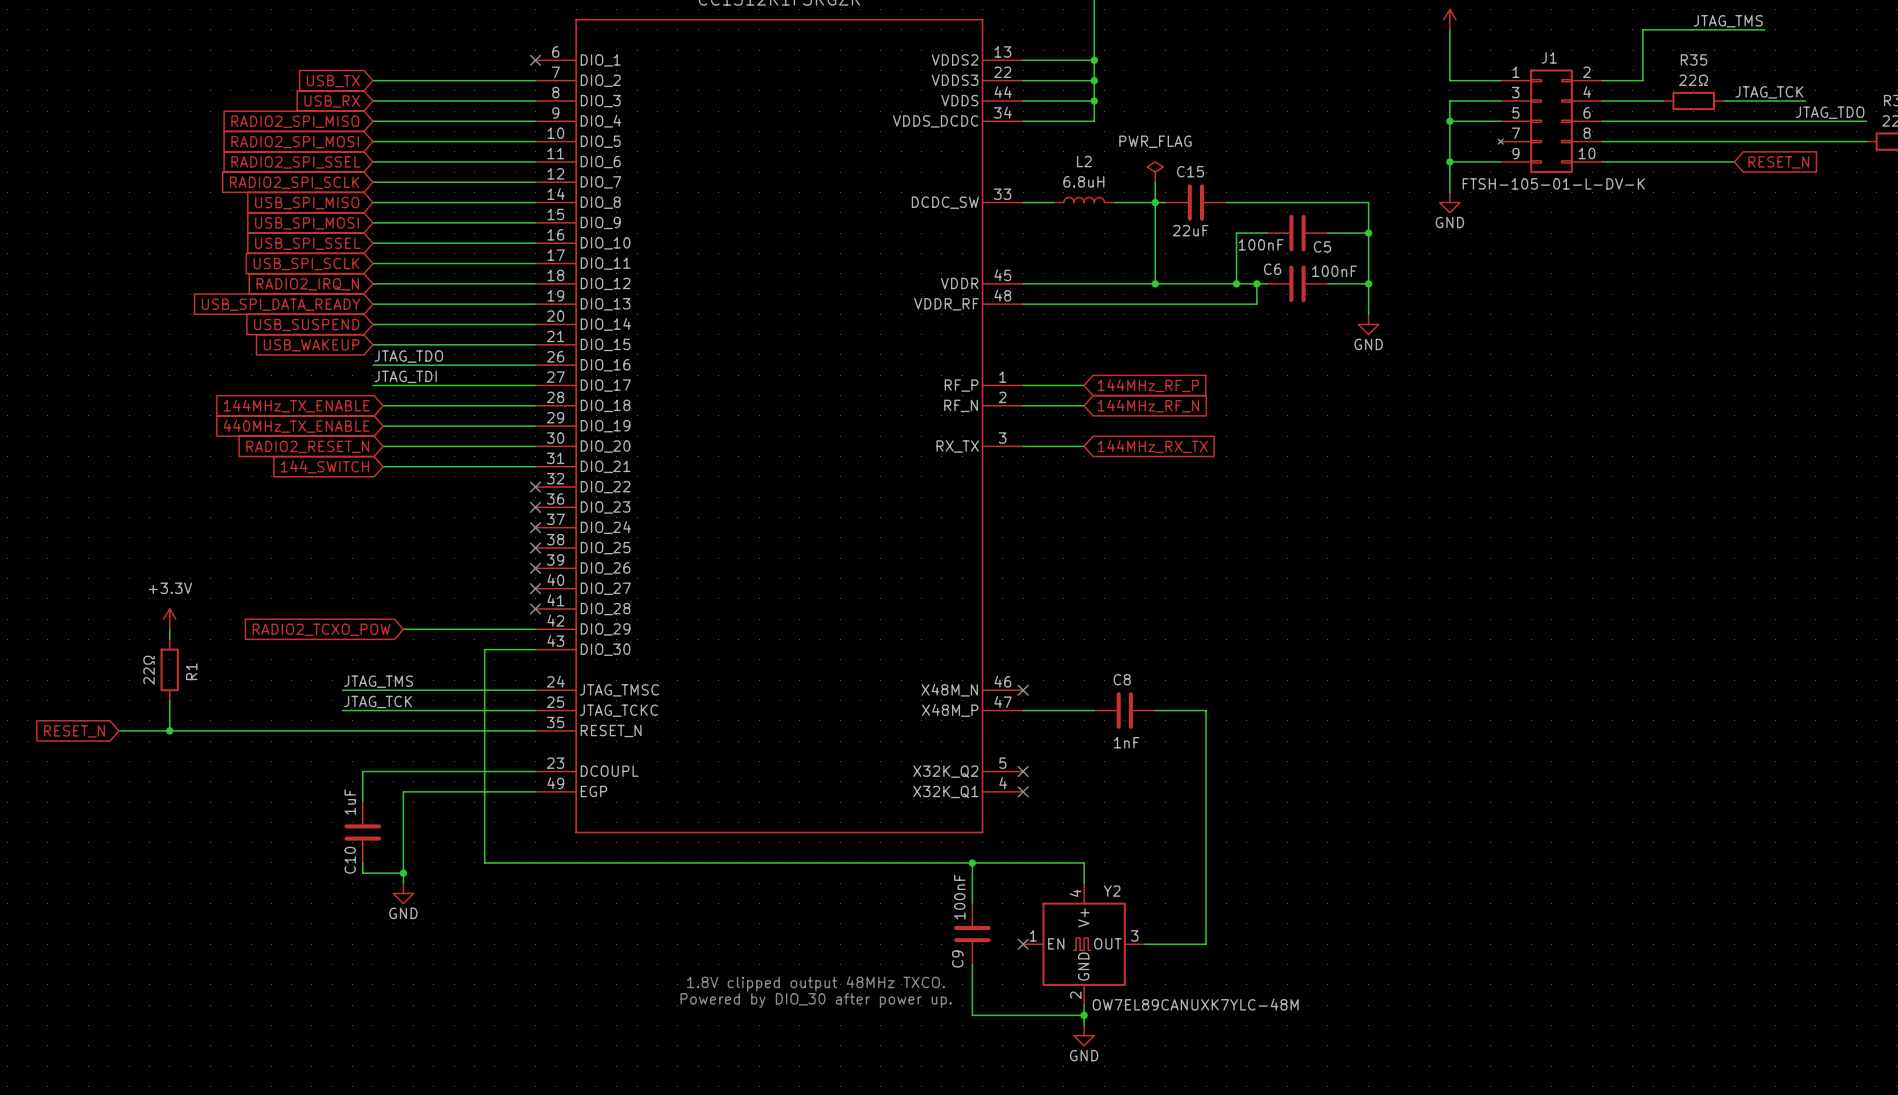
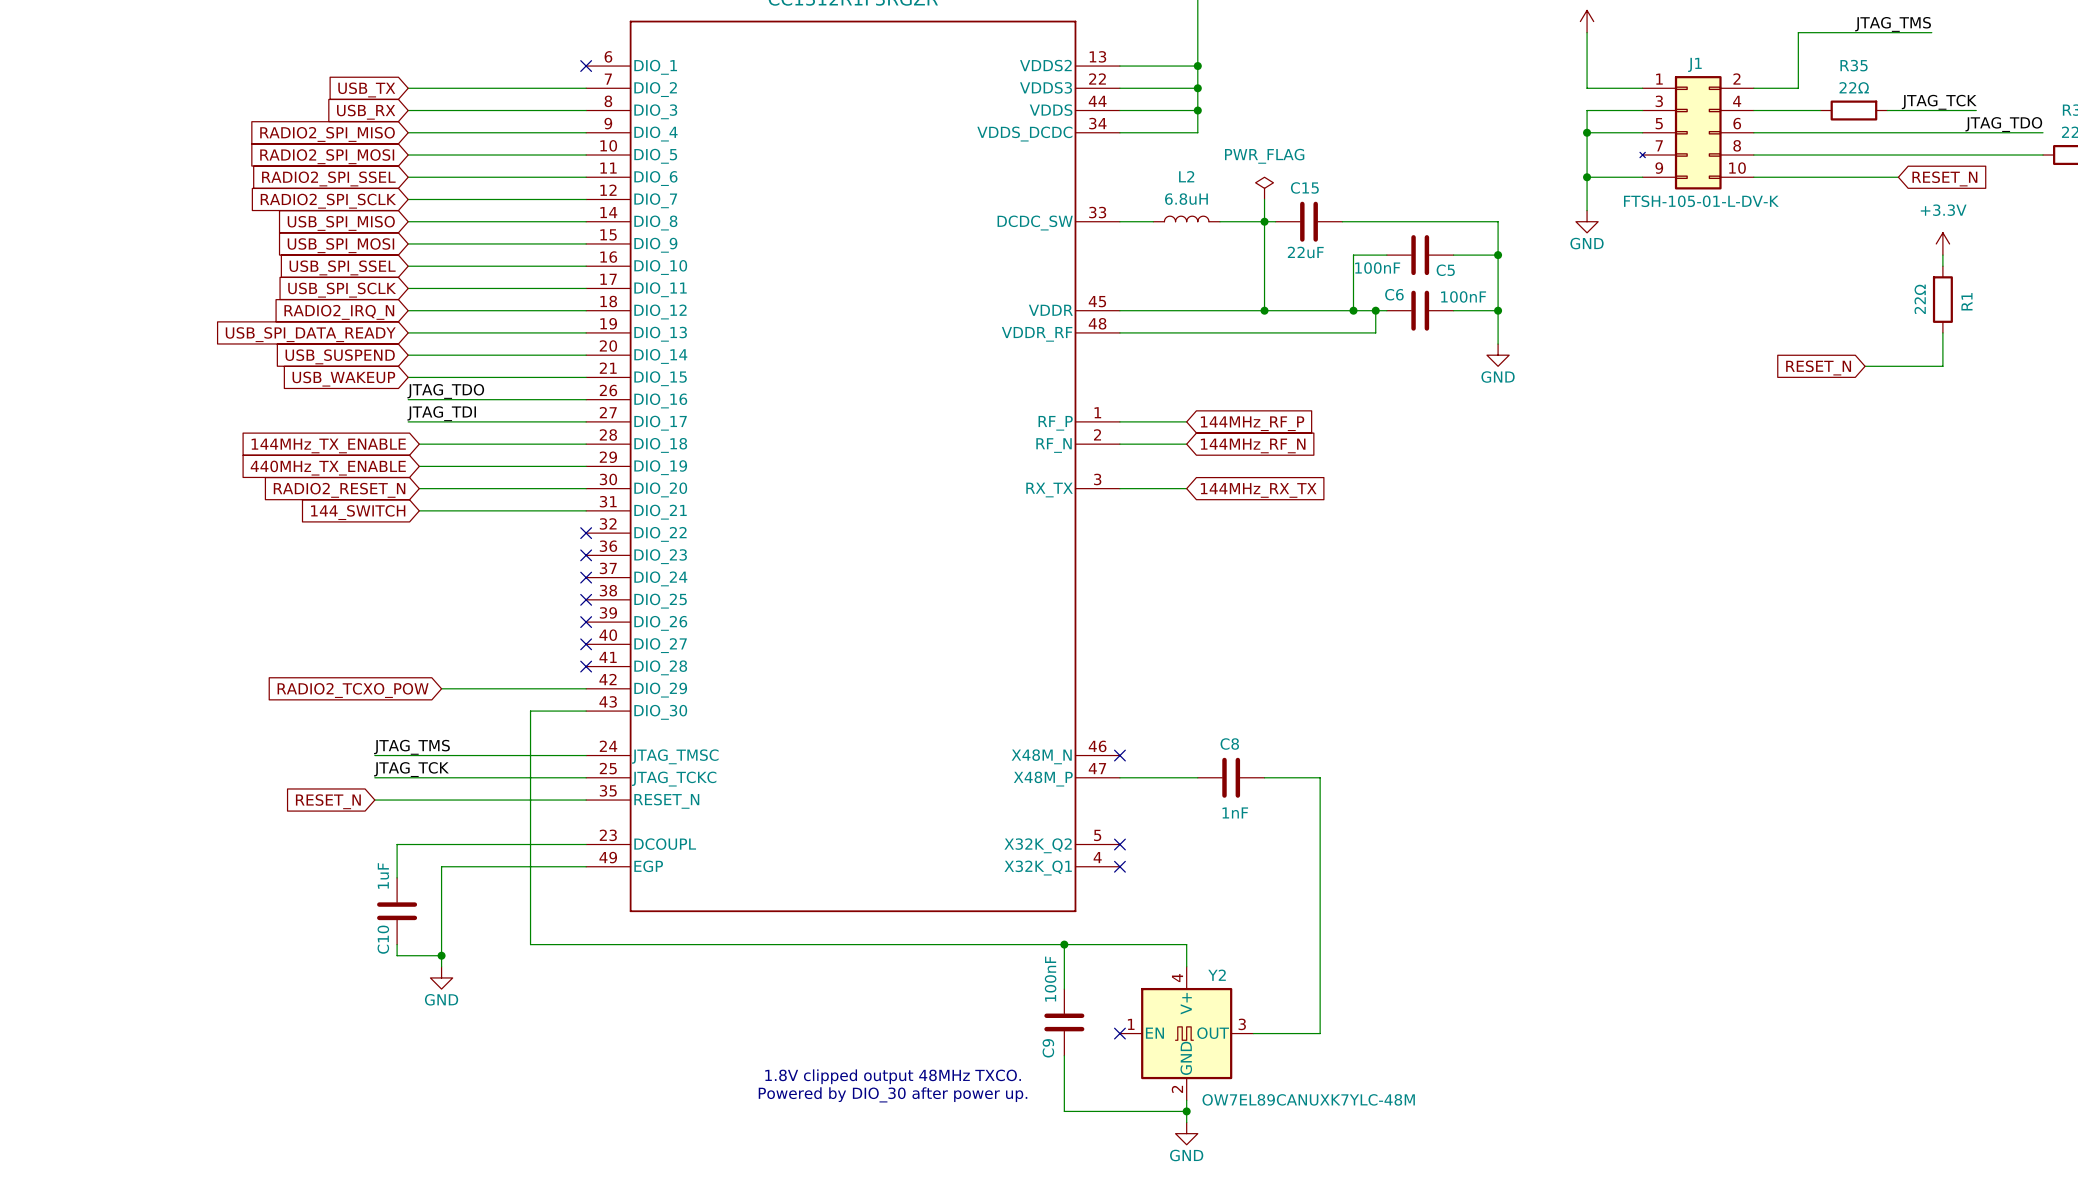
power symbol: none -> +3.3V (1942, 243)
wire: none -> (1942, 255) (1942, 266)
wire: none -> (1942, 332) (1942, 366) (1865, 366)
global label: none -> RESET_N (1818, 368)
power symbol: +3.3V (169, 619) -> none
wire: (169, 629) (169, 639) -> none
R1 position: (169, 669) -> (1942, 299)
wire: (169, 700) (169, 730) -> none
wire: (118, 730) (342, 730) -> none
junction: (169, 730) -> none
global label: RESET_N (74, 731) -> none
global label: none -> RESET_N (328, 801)

